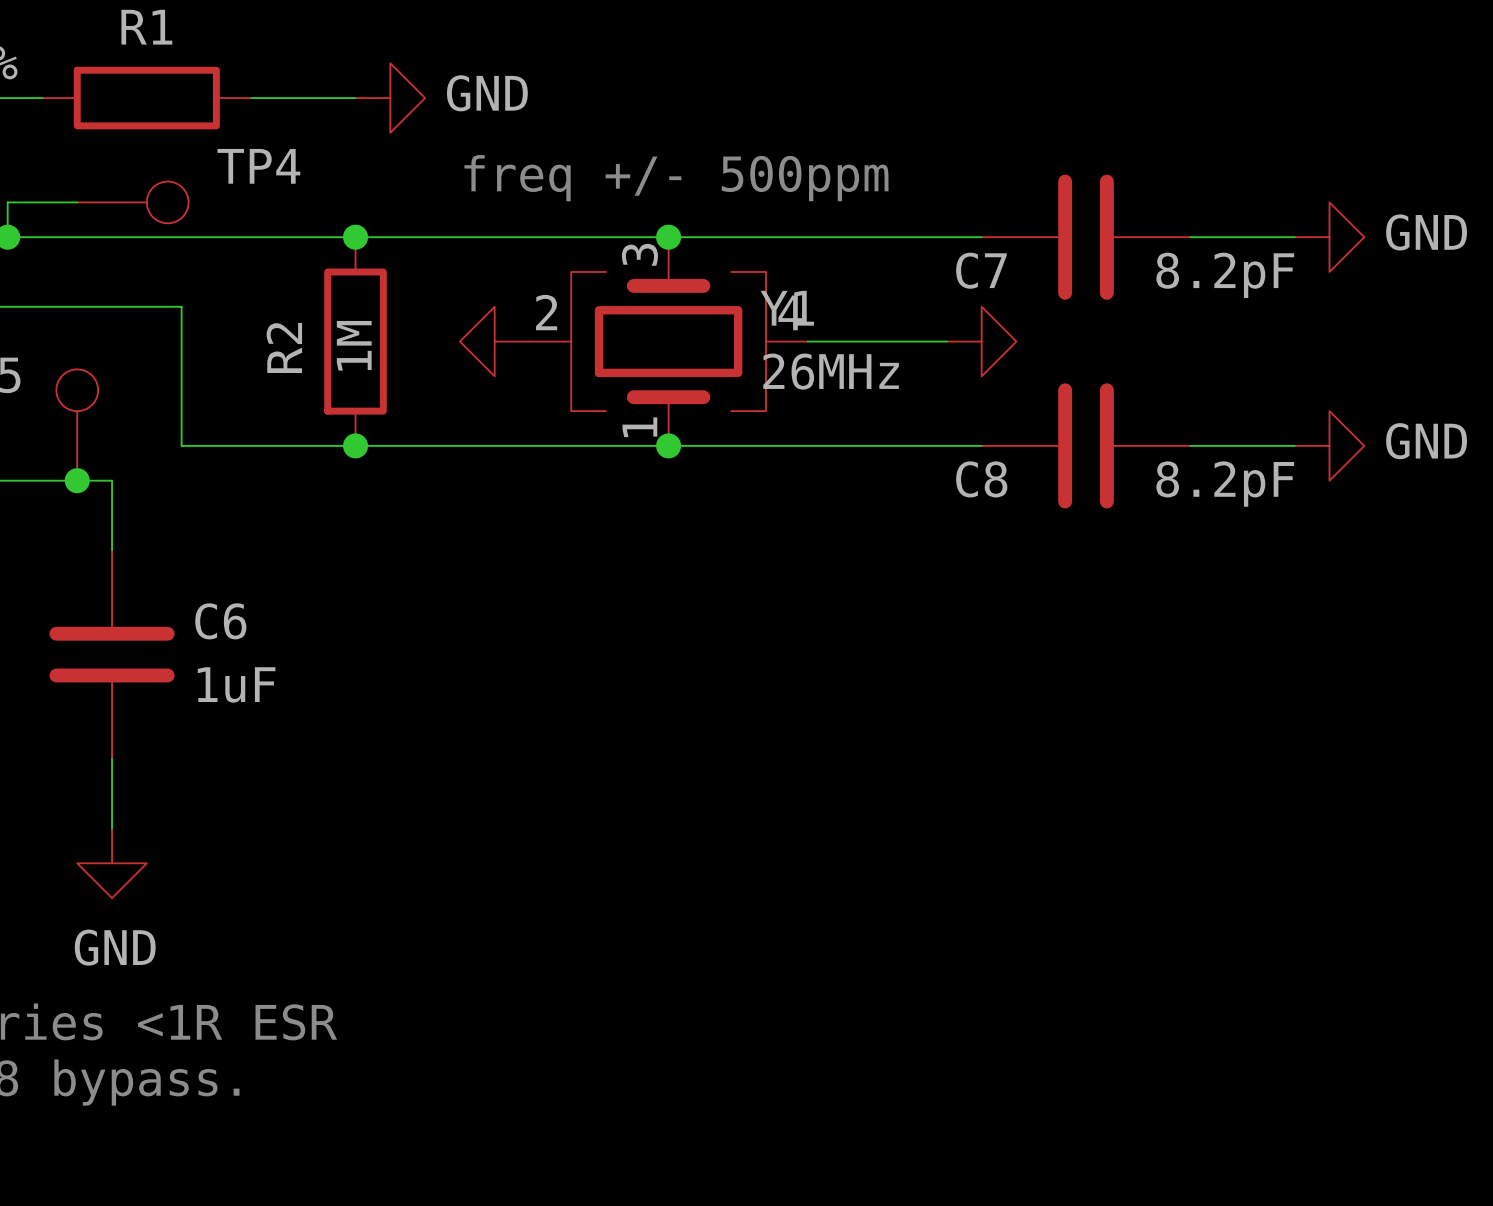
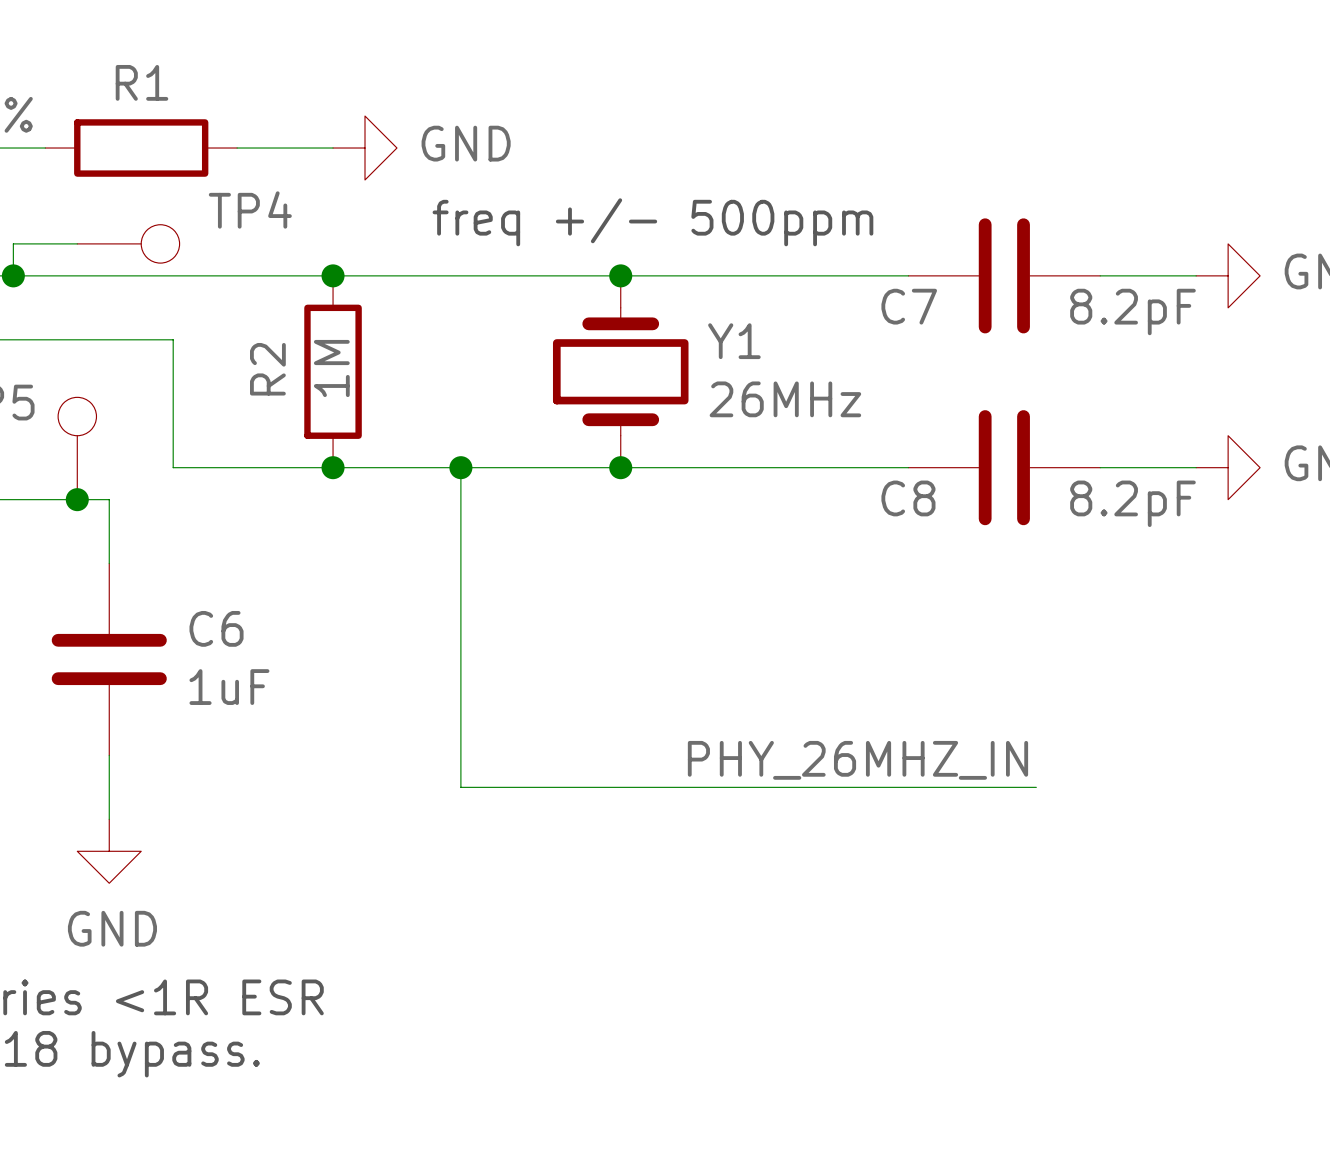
Y1 symbol: [529, 237, 808, 446] -> [552, 275, 689, 468]
power symbol: (494, 341) -> none
wire: (807, 341) (946, 341) -> none
power symbol: (981, 341) -> none
wire: none -> (460, 467) (460, 787) (1036, 787)
junction: none -> (460, 467)
label: none -> PHY_26MHZ_IN (857, 760)

